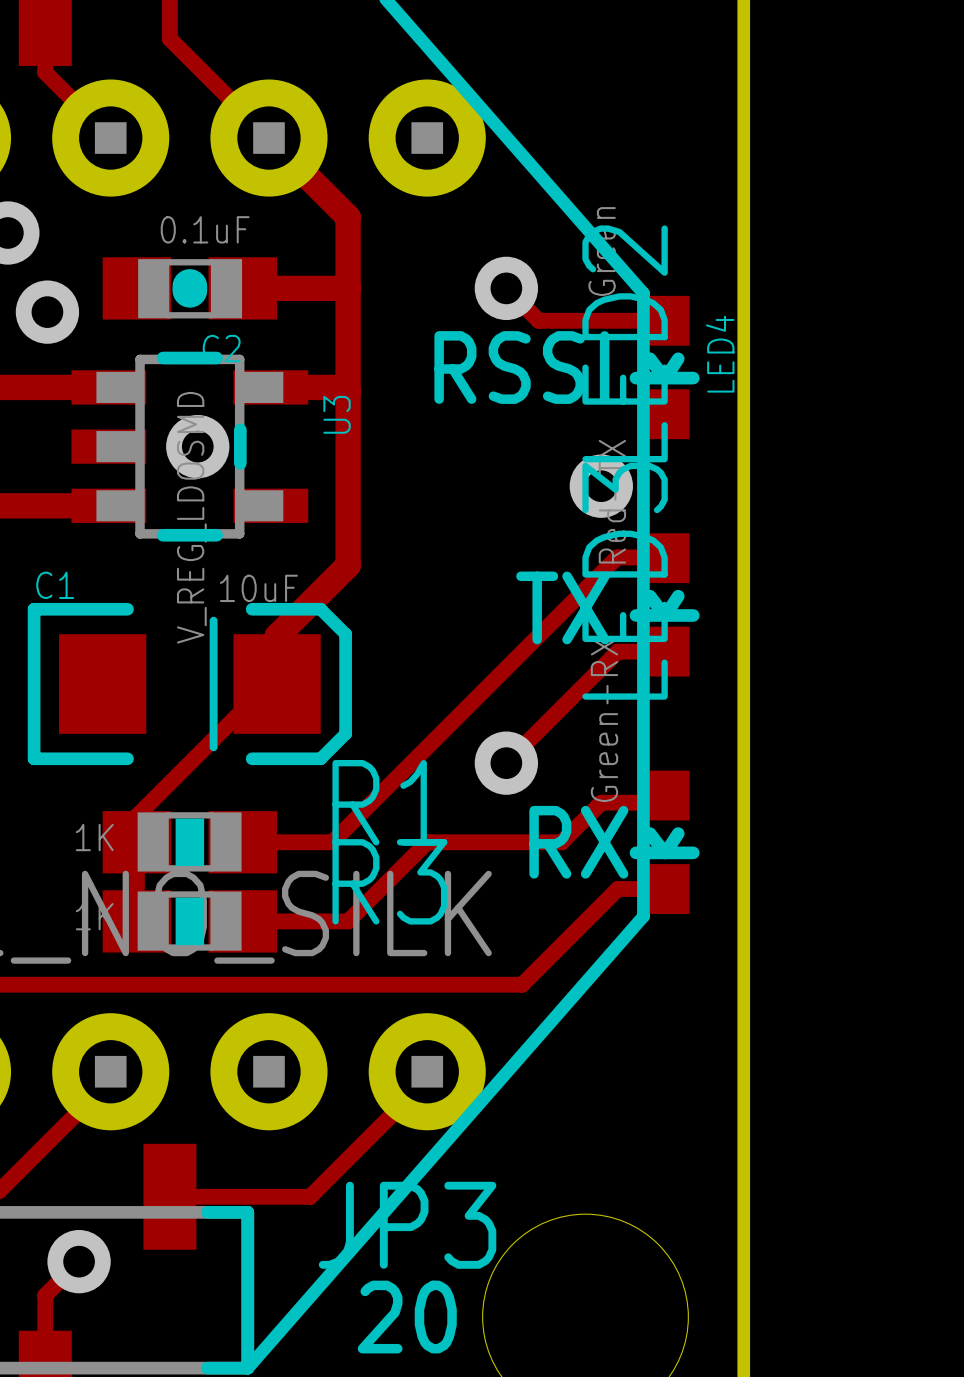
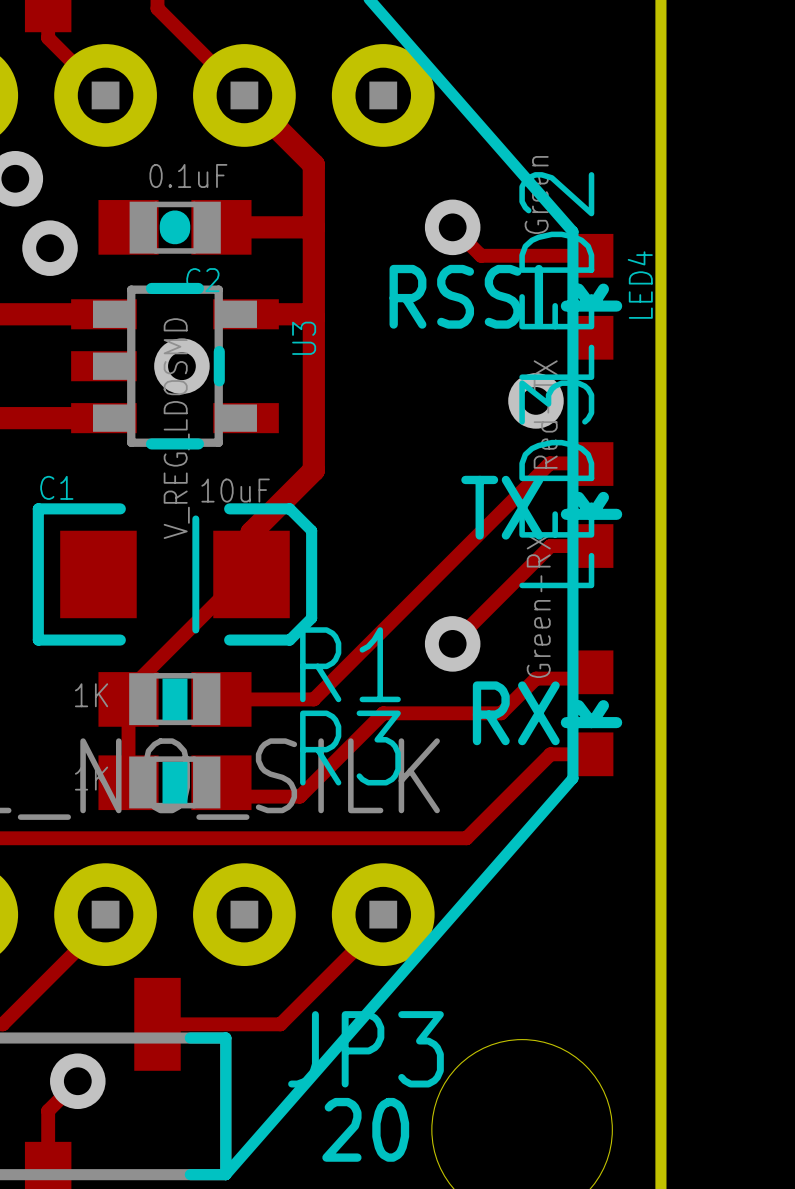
track: (348, 826) (332, 842) (242, 842) -> (313, 699) (221, 699)
R1 position: (189, 842) -> (174, 699)
track: (242, 921) (348, 921) -> (221, 796) (299, 796) (313, 782)

